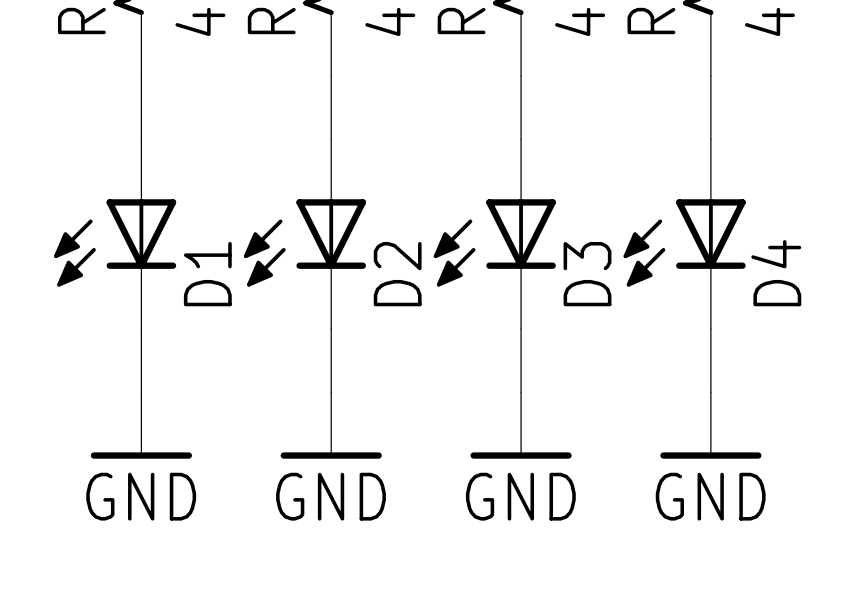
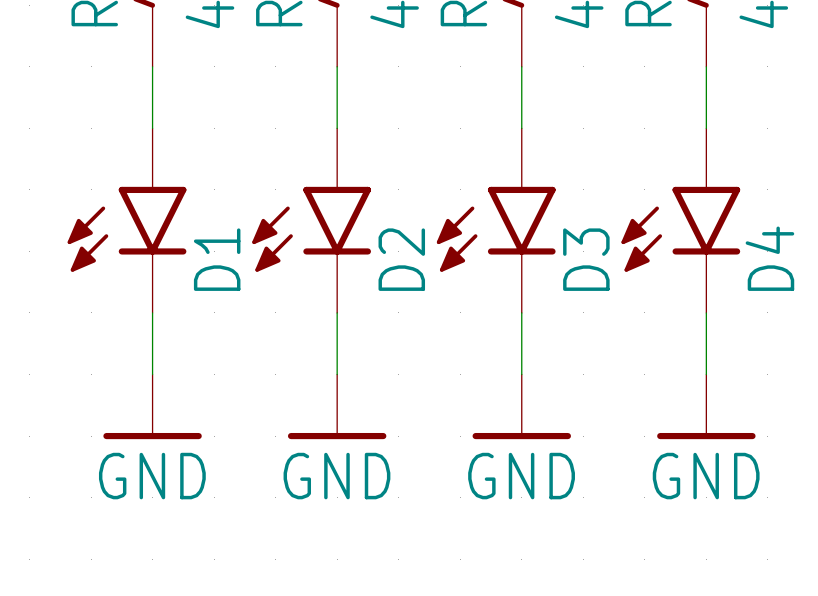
D1 symbol: [54, 139, 177, 329] -> [67, 128, 187, 313]
D2 symbol: [243, 139, 367, 329] -> [252, 128, 372, 313]
D3 symbol: [433, 139, 556, 329] -> [436, 128, 556, 313]
D4 symbol: [623, 139, 746, 329] -> [621, 128, 741, 313]

